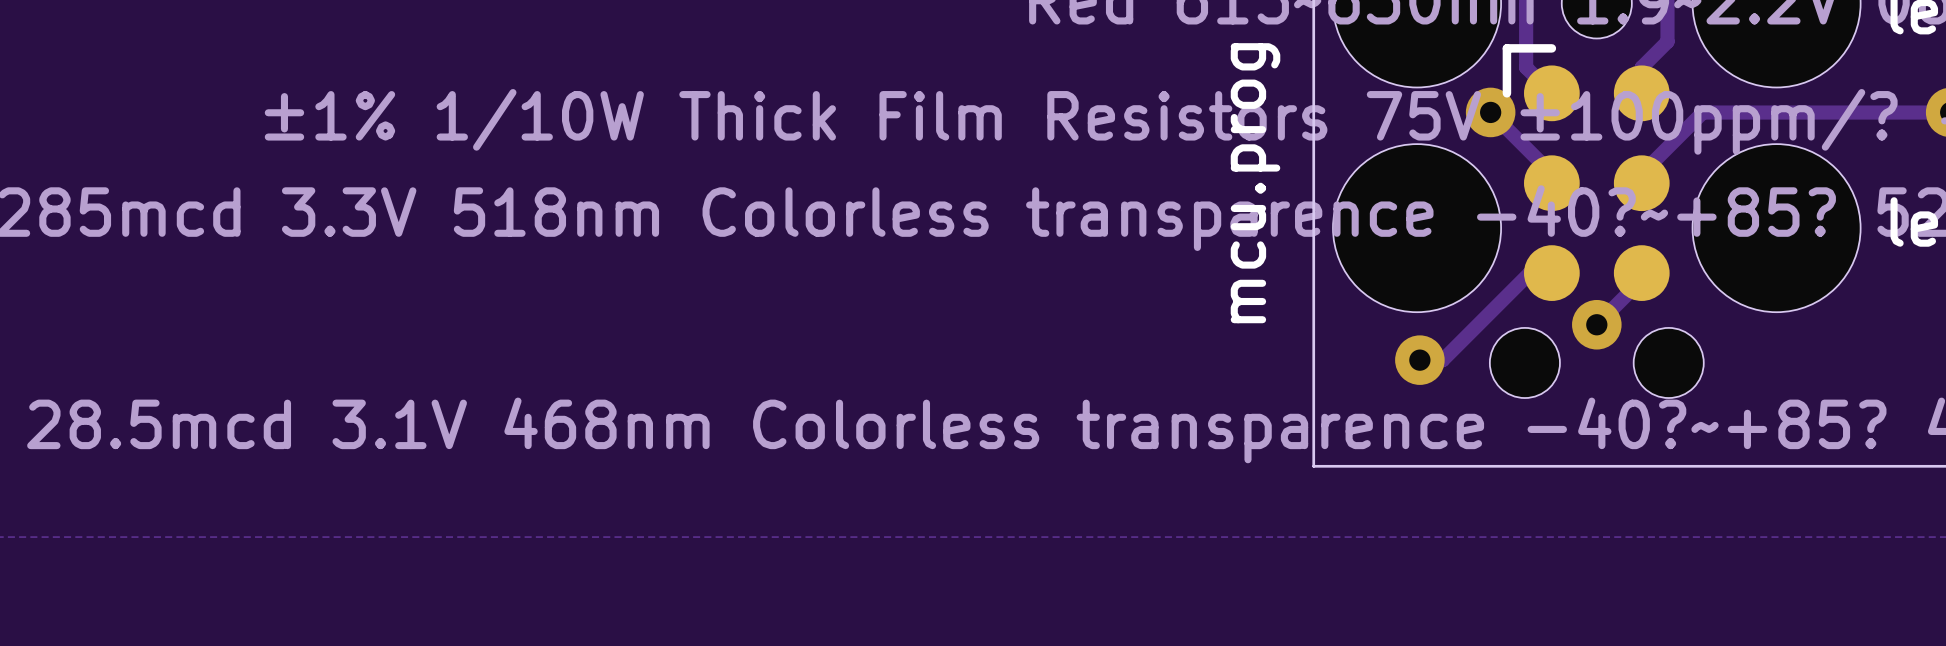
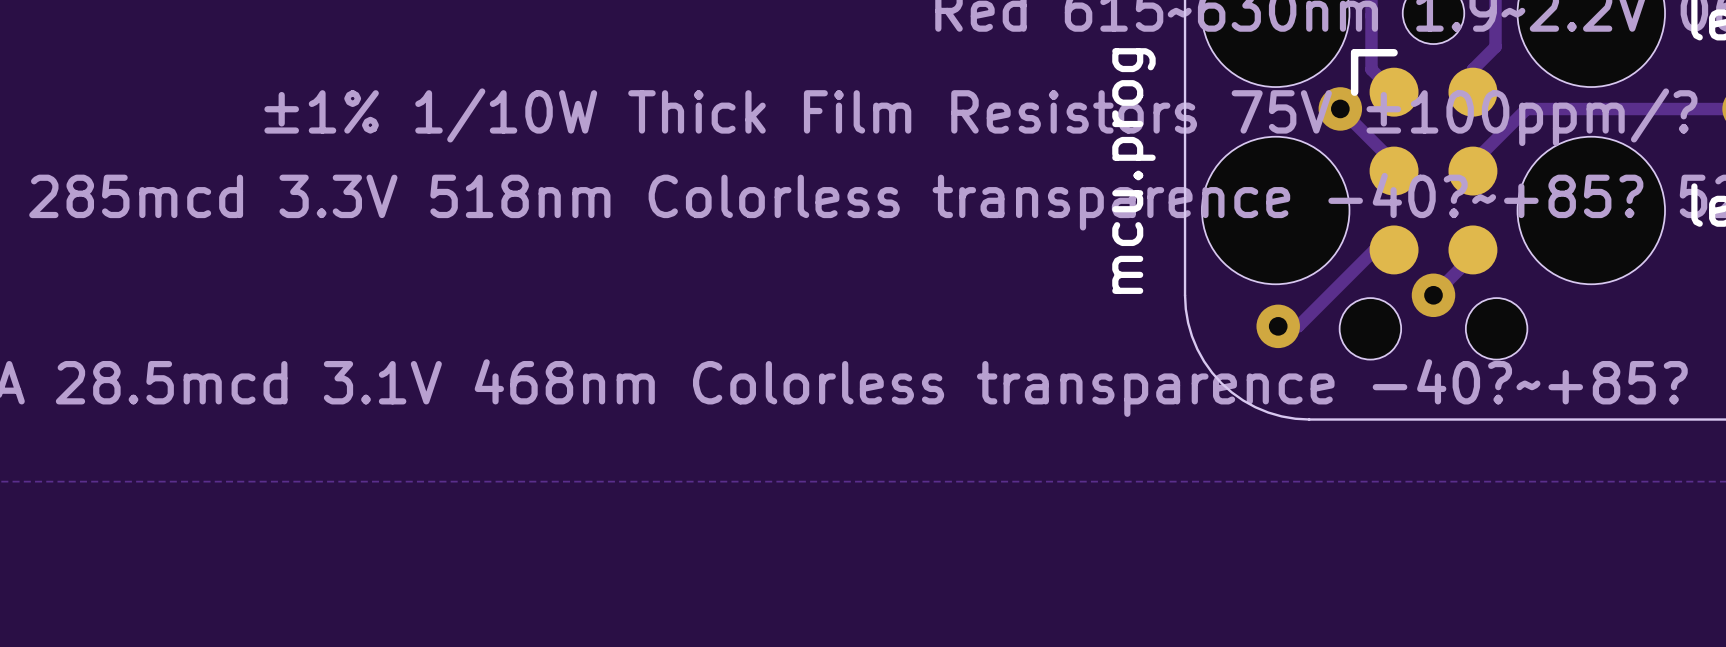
board edge: (1313, 324) (1313, 466) (1455, 466) -> (1185, 295) (1185, 309) (1192, 336) (1204, 361) (1221, 383) (1243, 400) (1268, 412) (1281, 416) (1309, 419)

